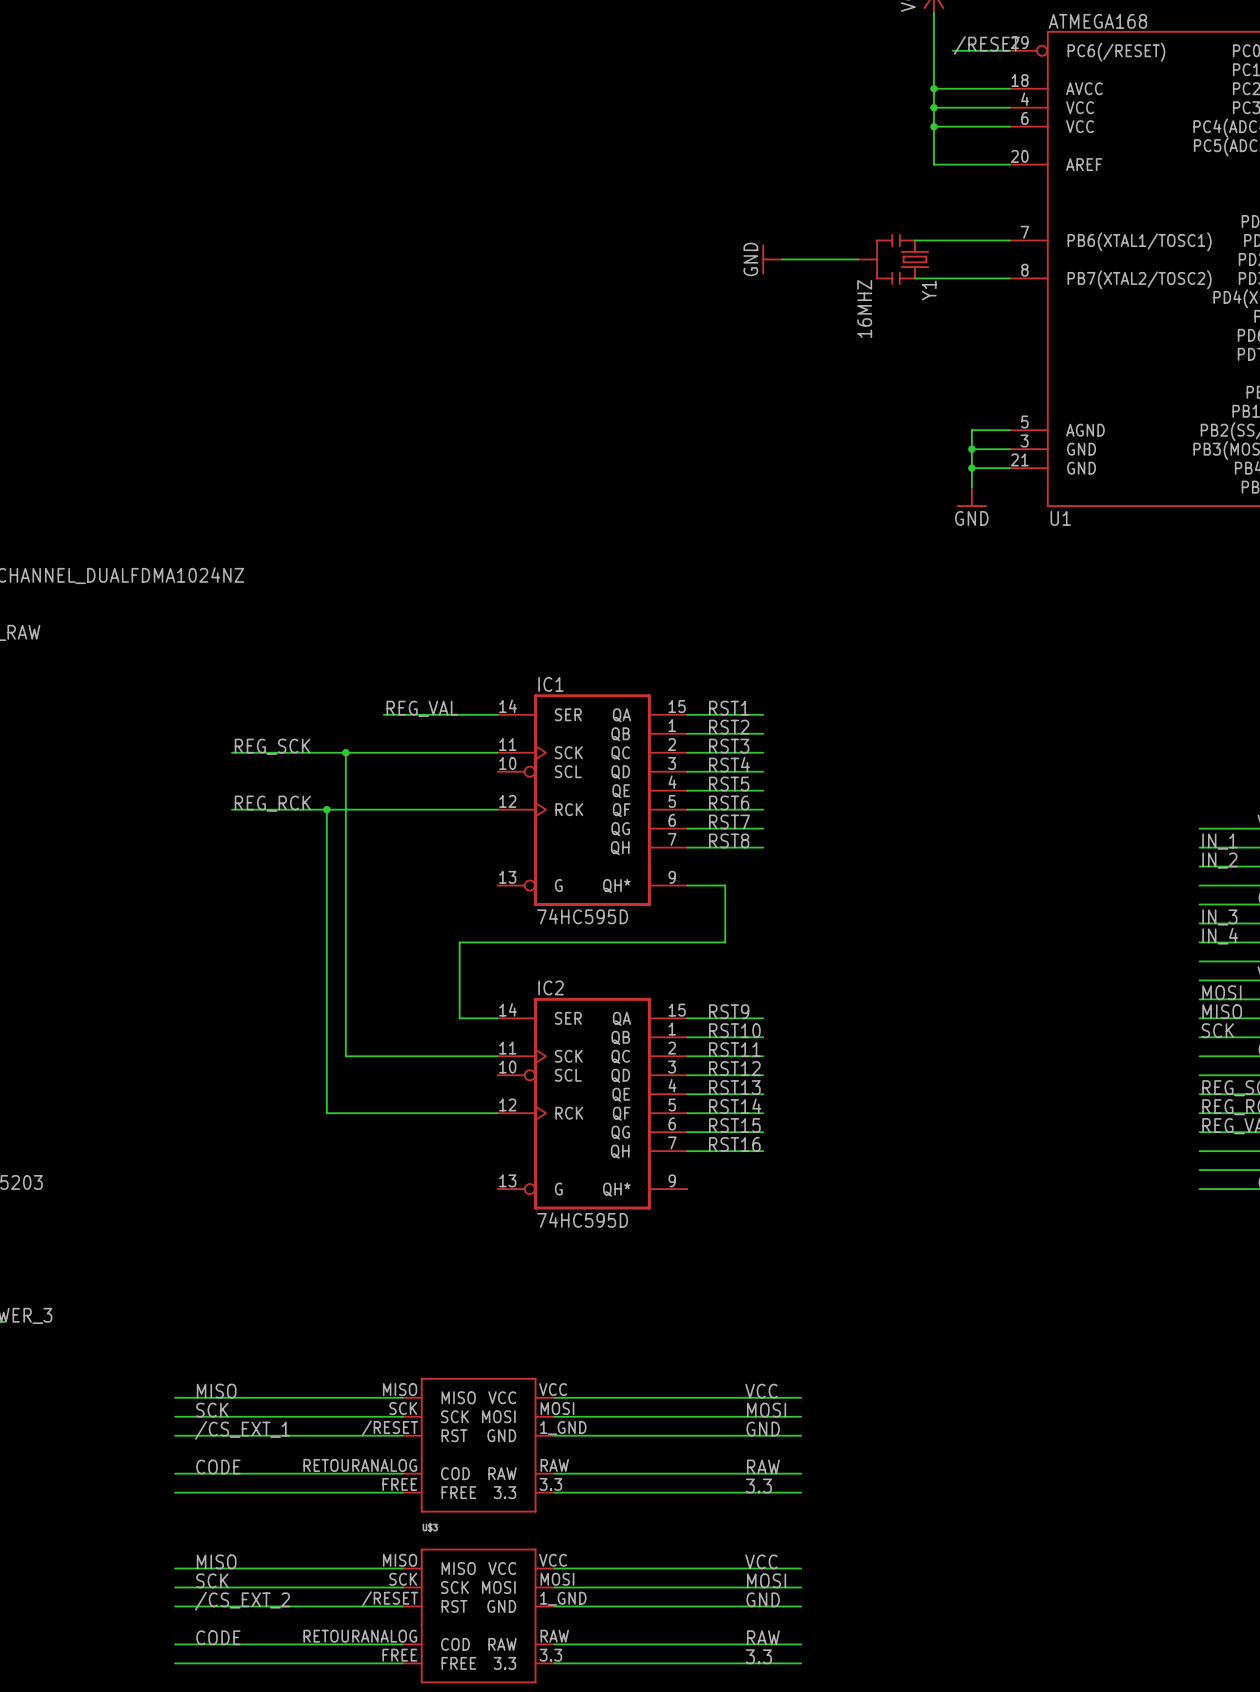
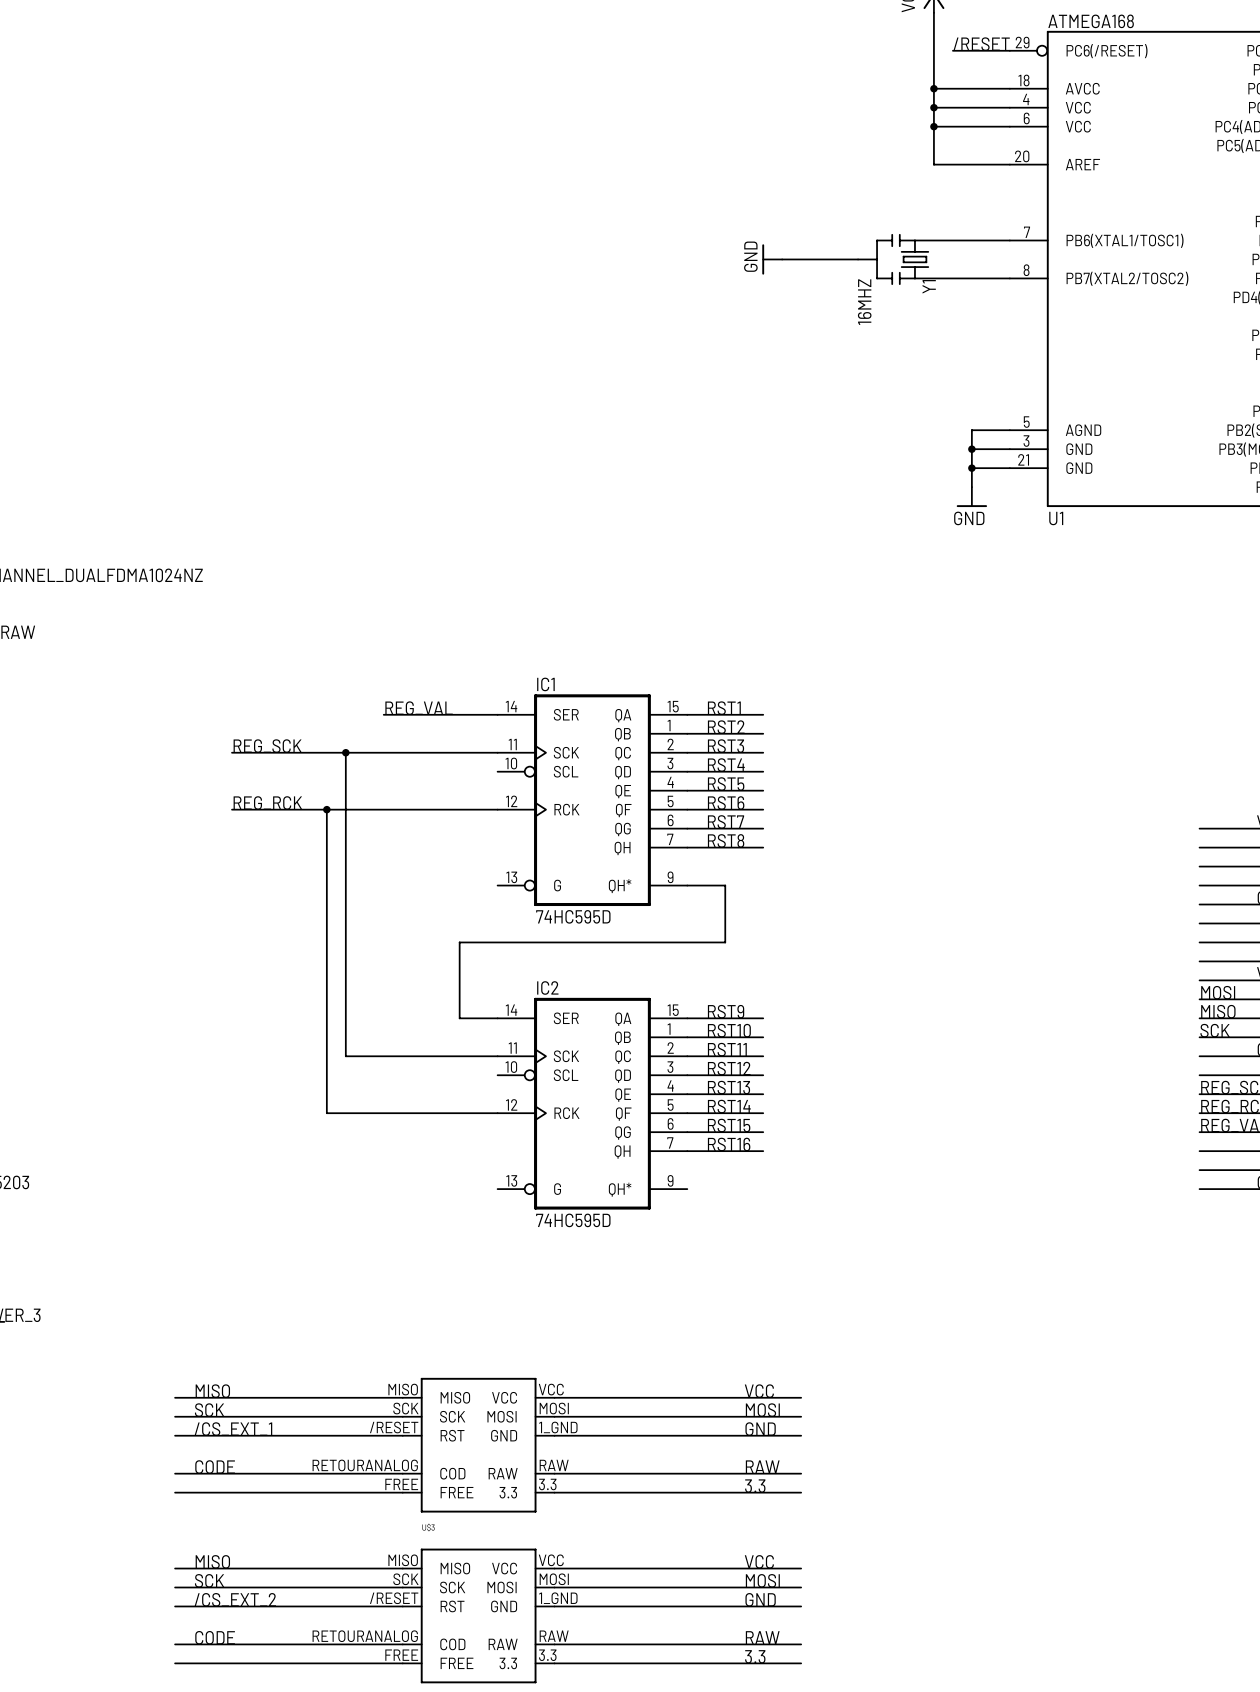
label: IN_1 (1219, 841) -> none
label: IN_2 (1219, 860) -> none
label: IN_3 (1219, 917) -> none
label: IN_4 (1220, 936) -> none

